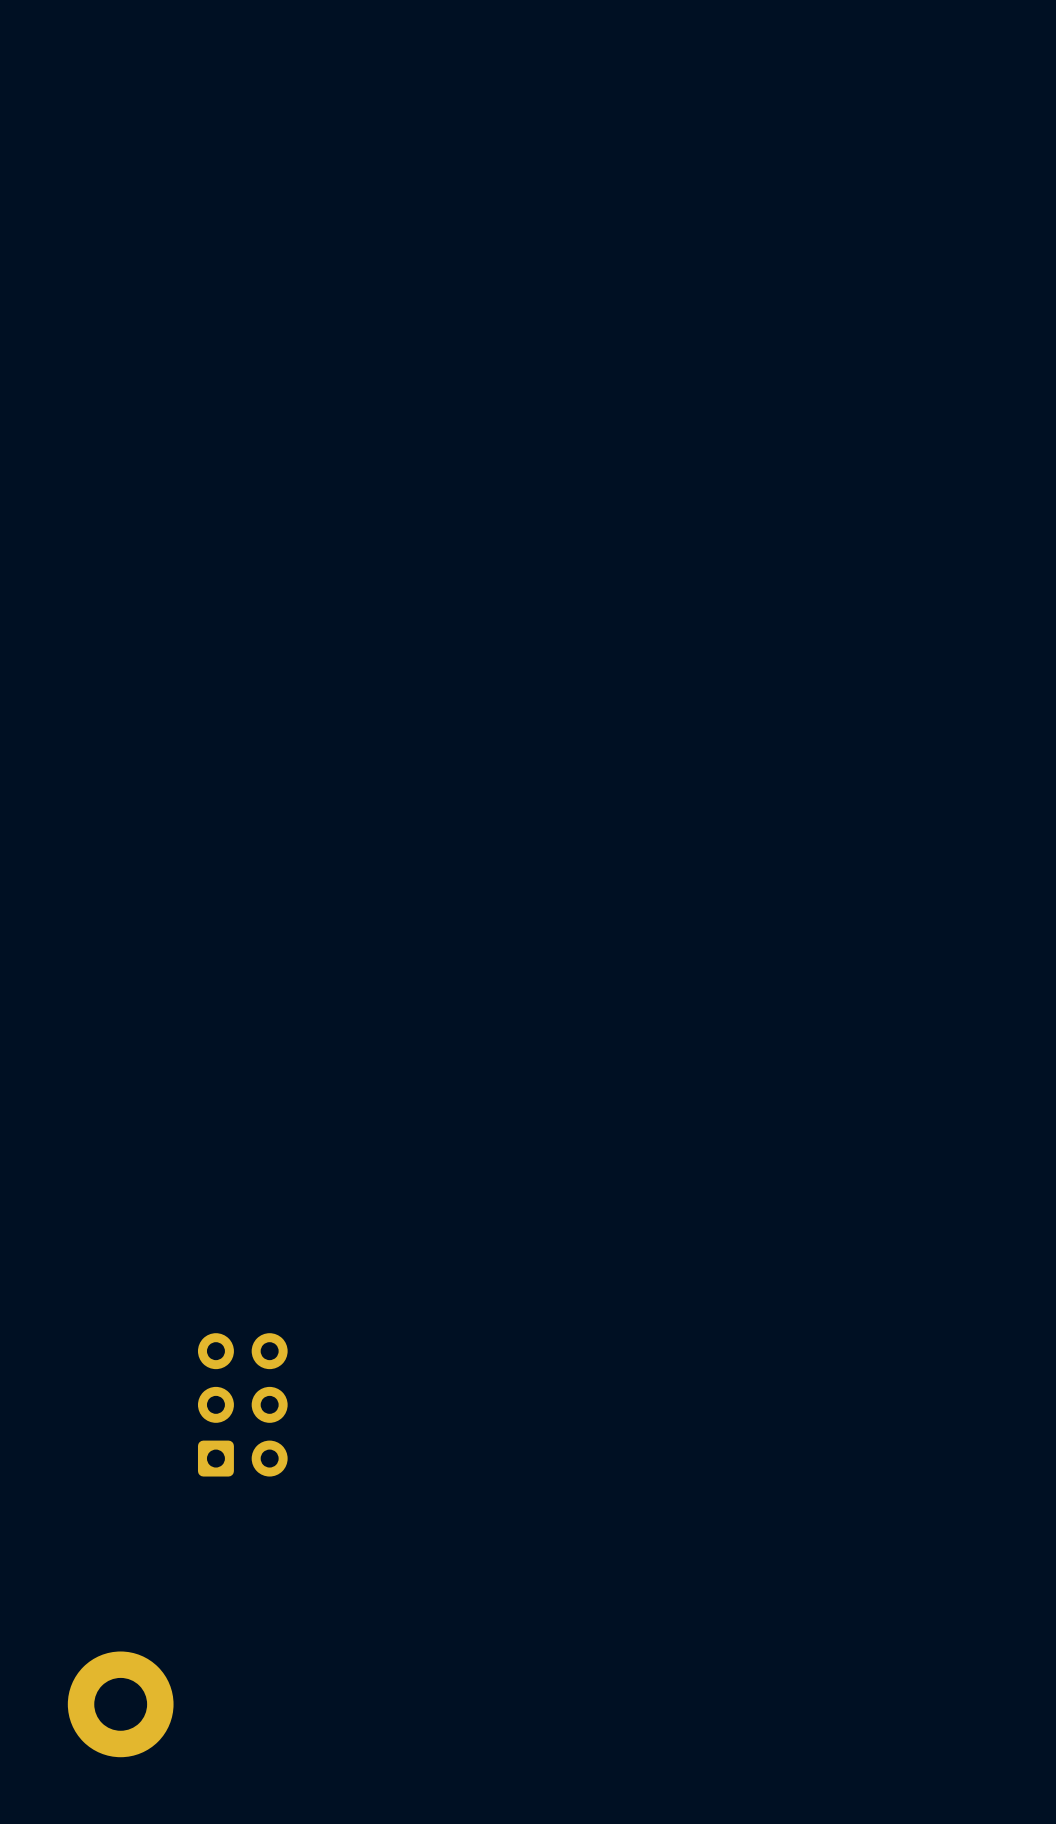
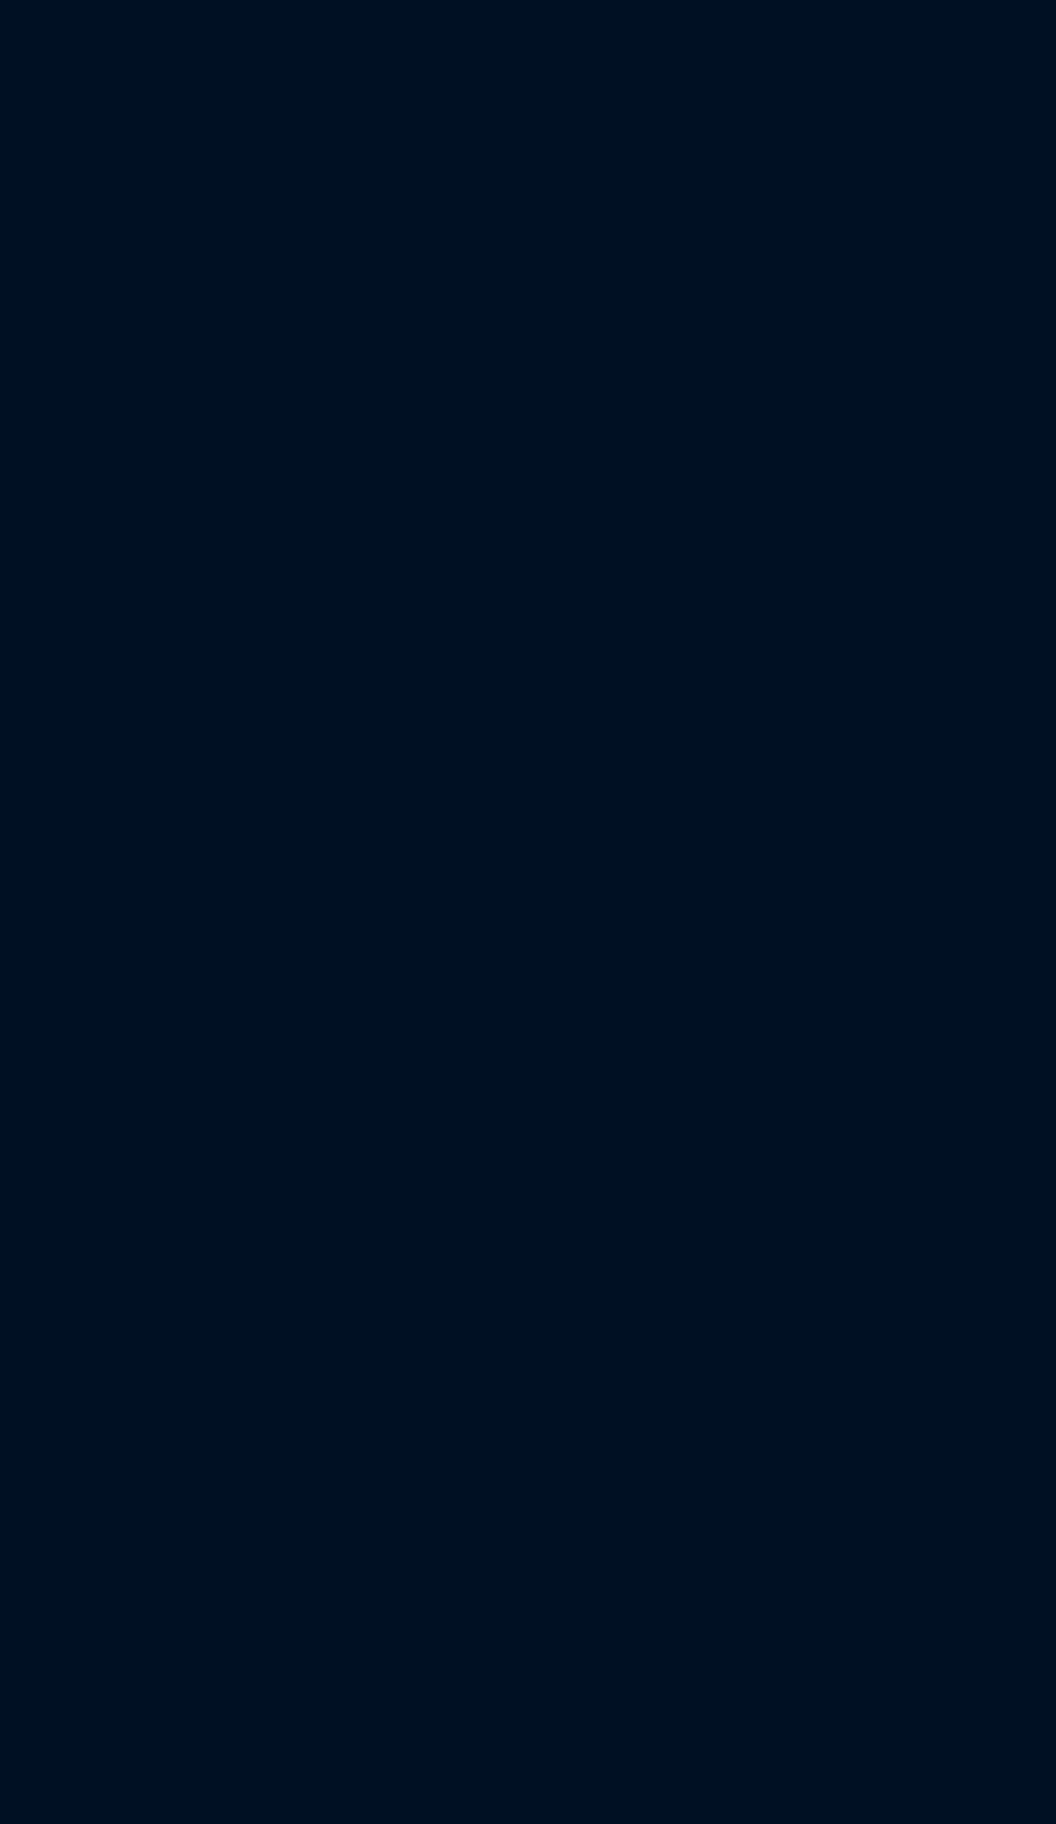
part: (242, 1404) -> none
part: (120, 1704) -> none

